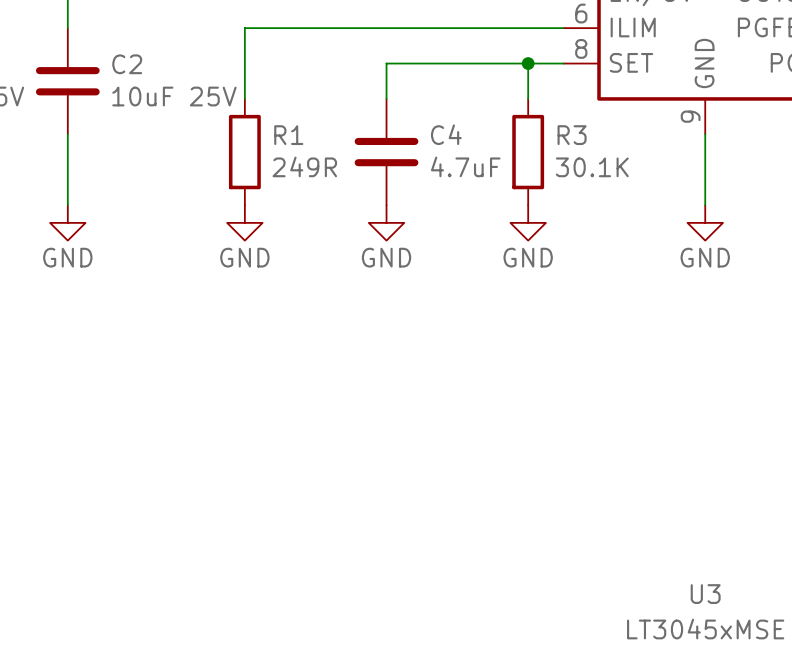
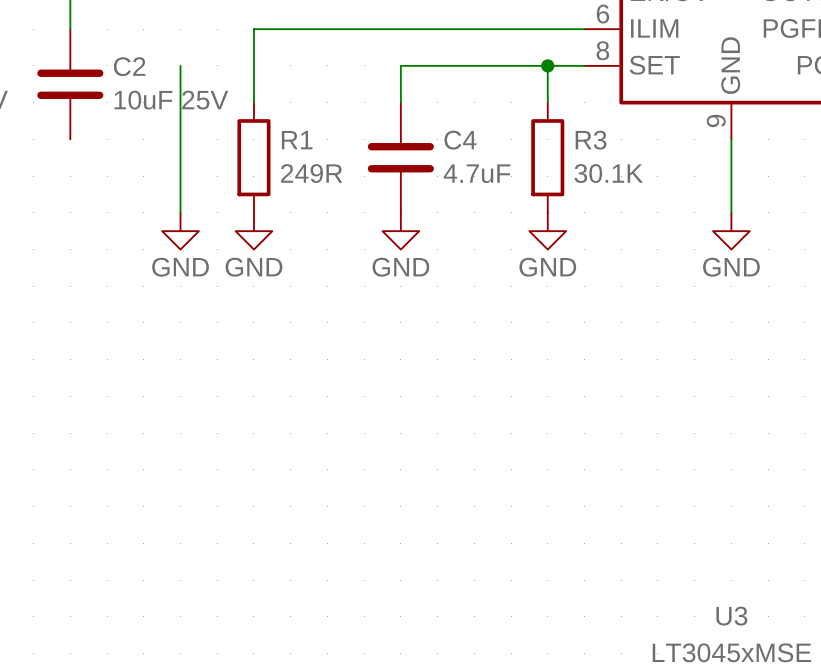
wire: none -> (180, 65) (180, 212)
wire: (67, 134) (67, 205) -> none
power symbol position: GND (67, 222) -> GND (180, 231)

